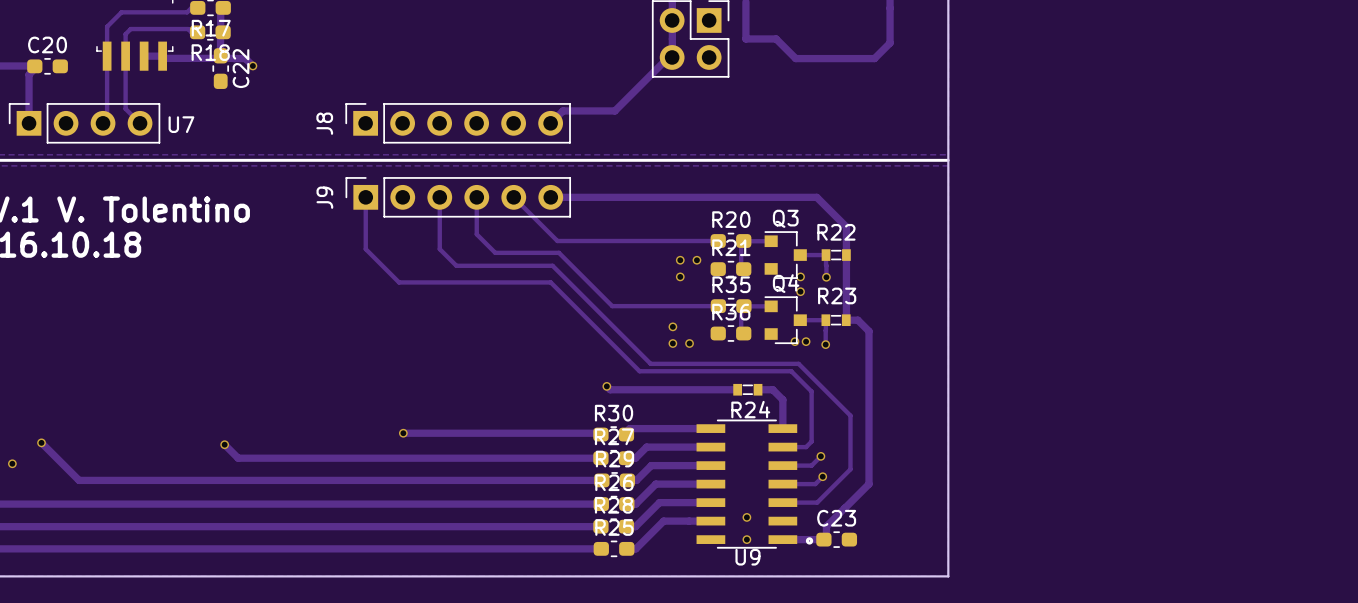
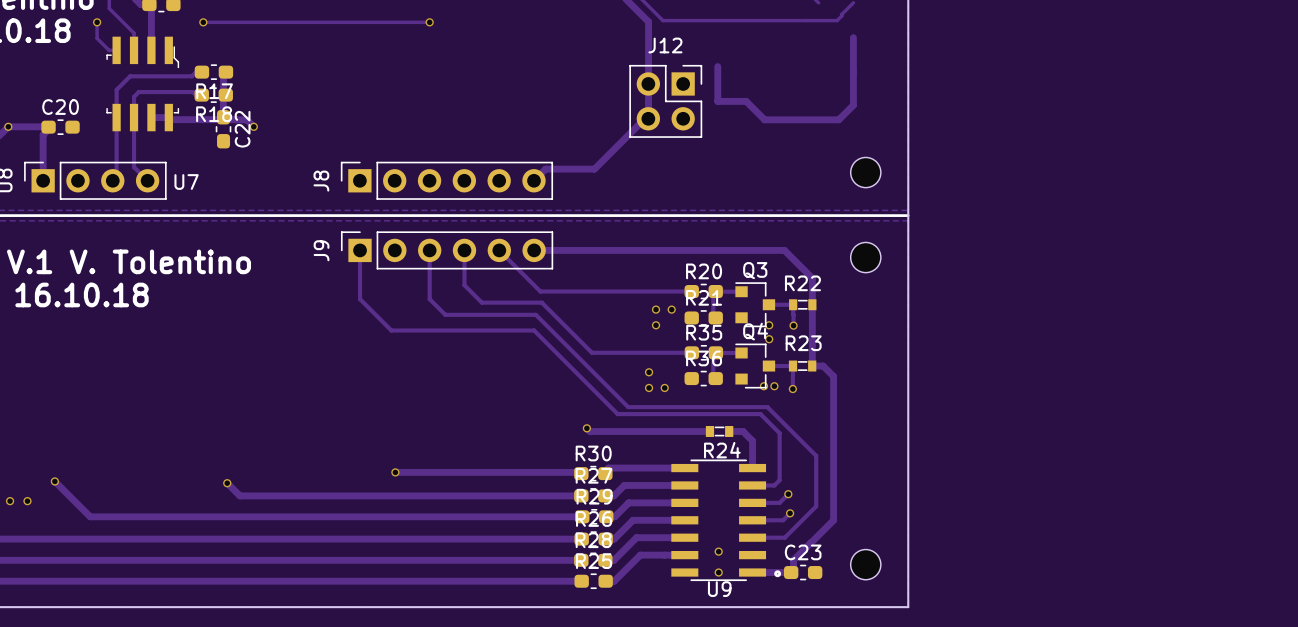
part: none -> (865, 172)
part: none -> (865, 257)
part: none -> (865, 564)

